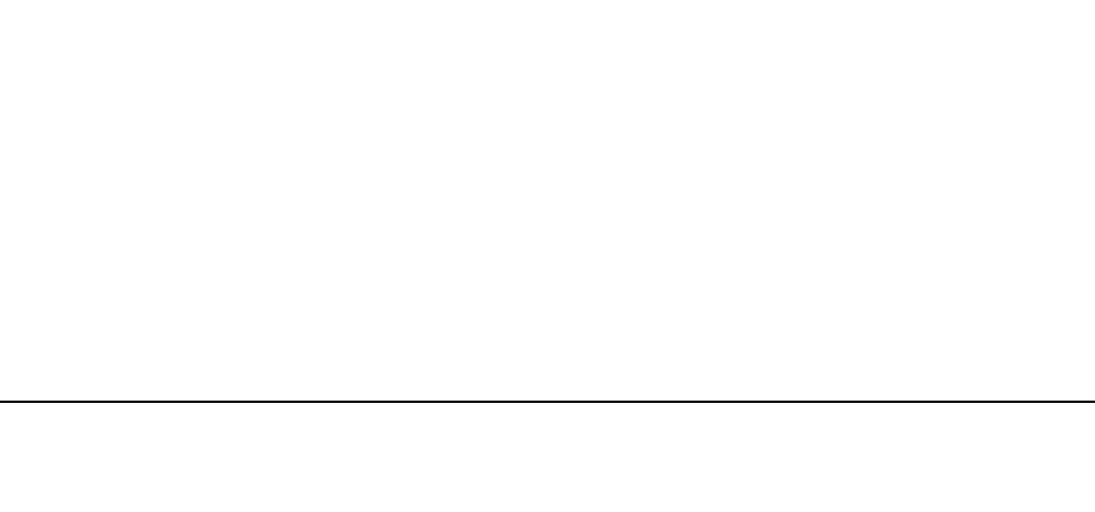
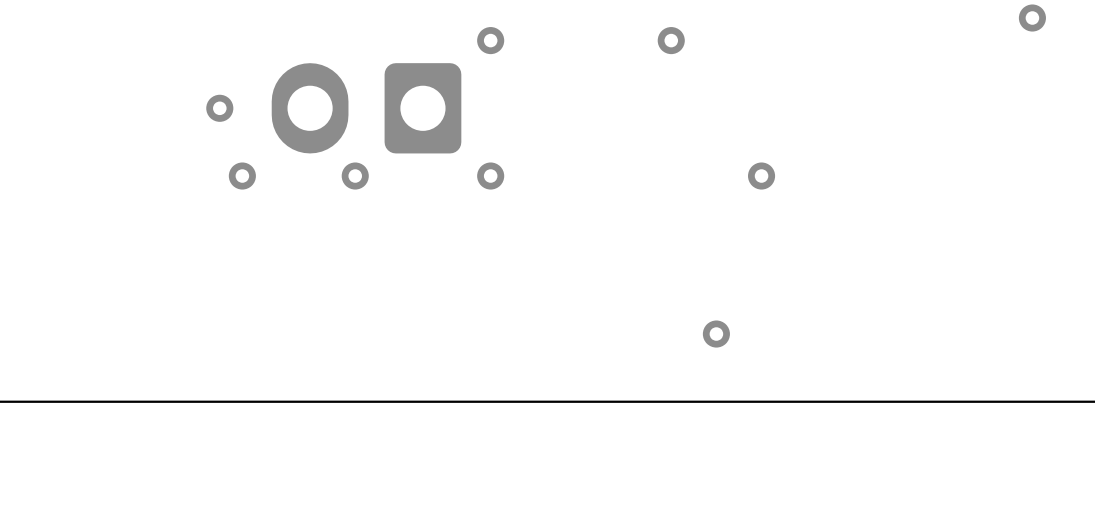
via: none -> (1032, 18)
via: none -> (490, 40)
via: none -> (671, 40)
via: none -> (219, 108)
part: none -> (366, 108)
via: none -> (242, 176)
via: none -> (355, 176)
via: none -> (490, 176)
via: none -> (761, 176)
via: none -> (716, 334)

